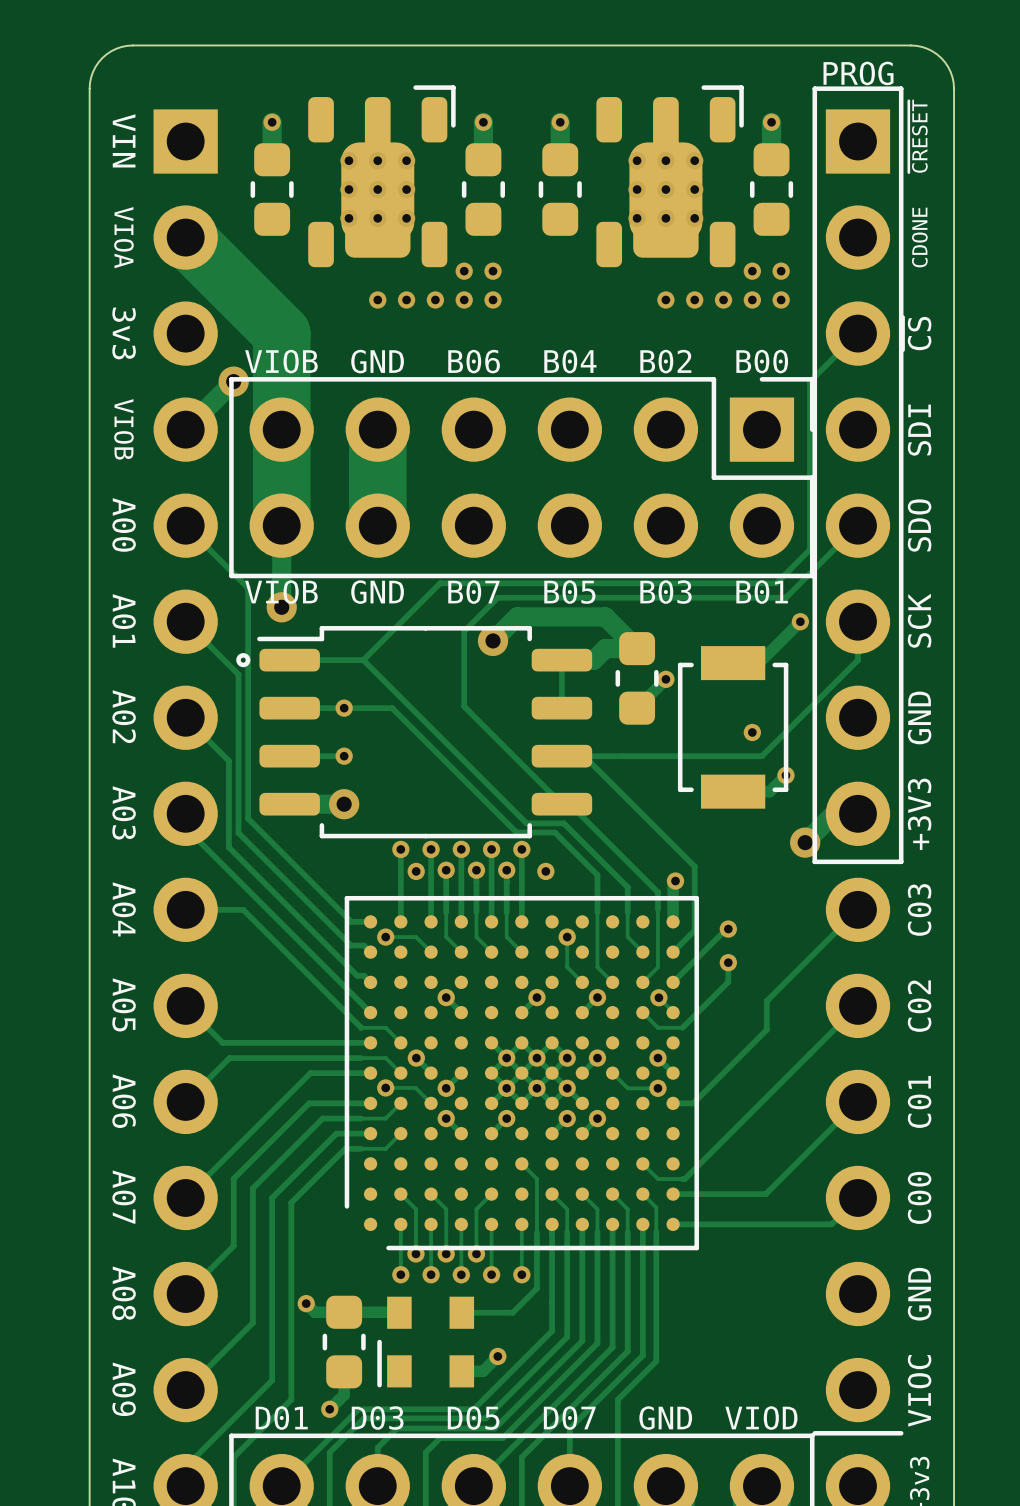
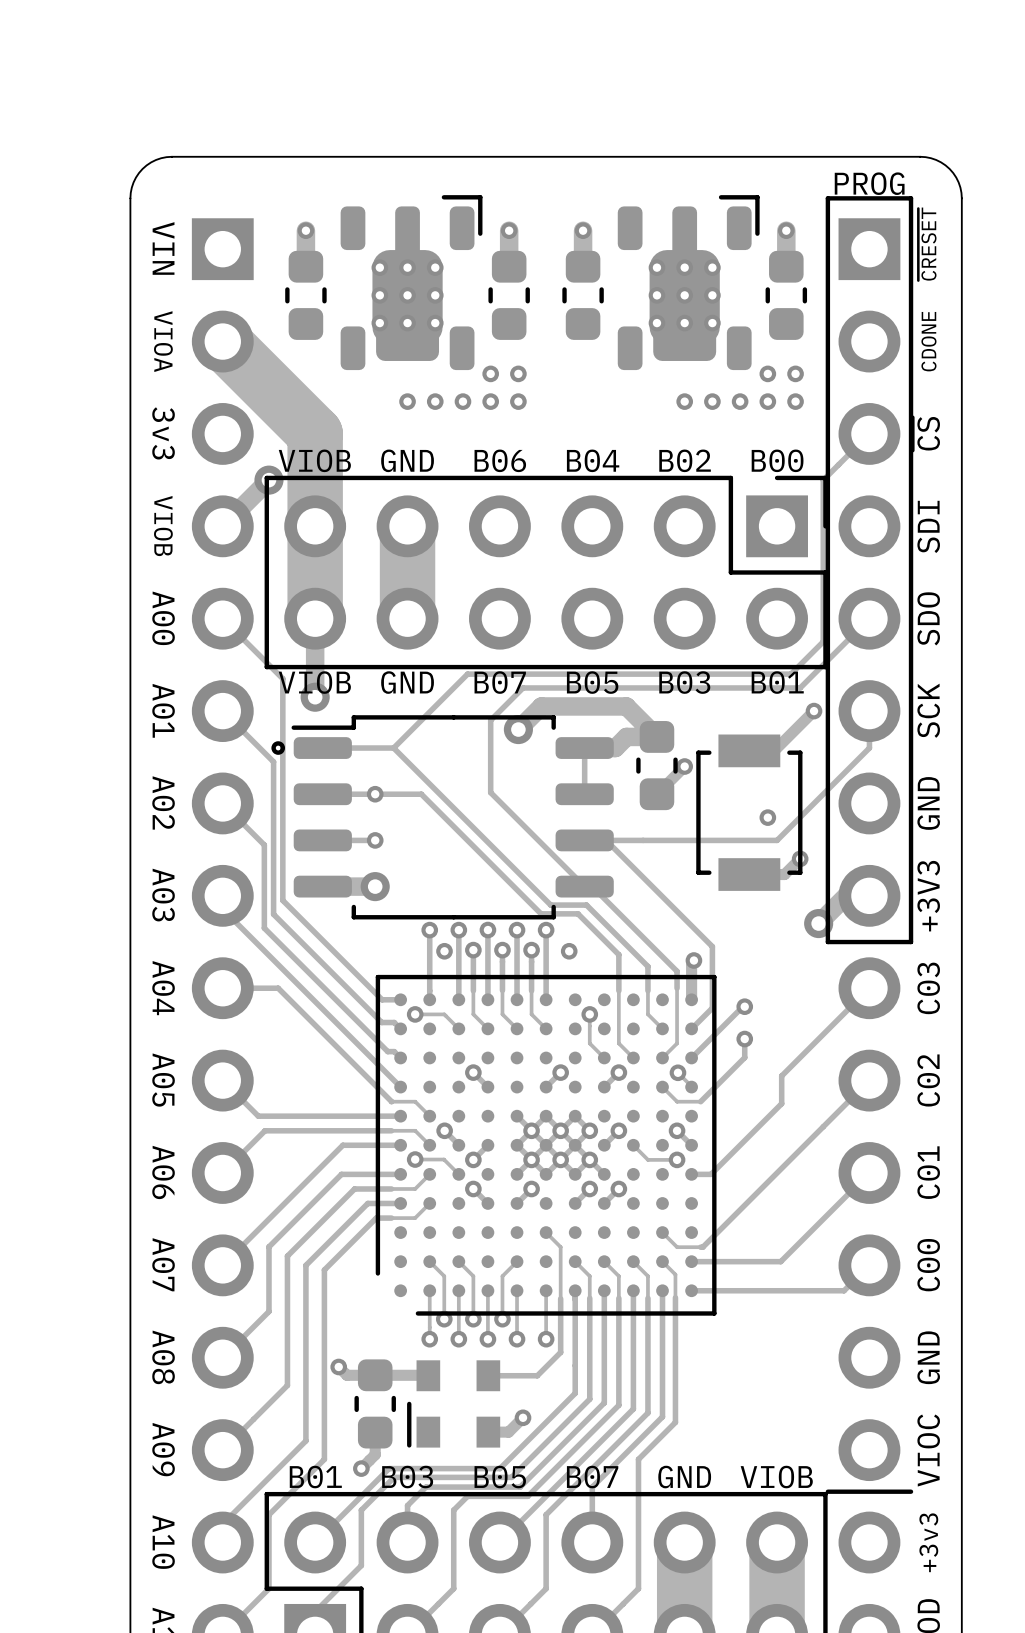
text: D01 (281, 1418) -> B01 (315, 1477)
text: D03 (377, 1418) -> B03 (407, 1477)
text: D05 (473, 1418) -> B05 (500, 1477)
text: D07 (569, 1418) -> B07 (592, 1477)
text: VIOD (761, 1418) -> VIOB (776, 1477)

